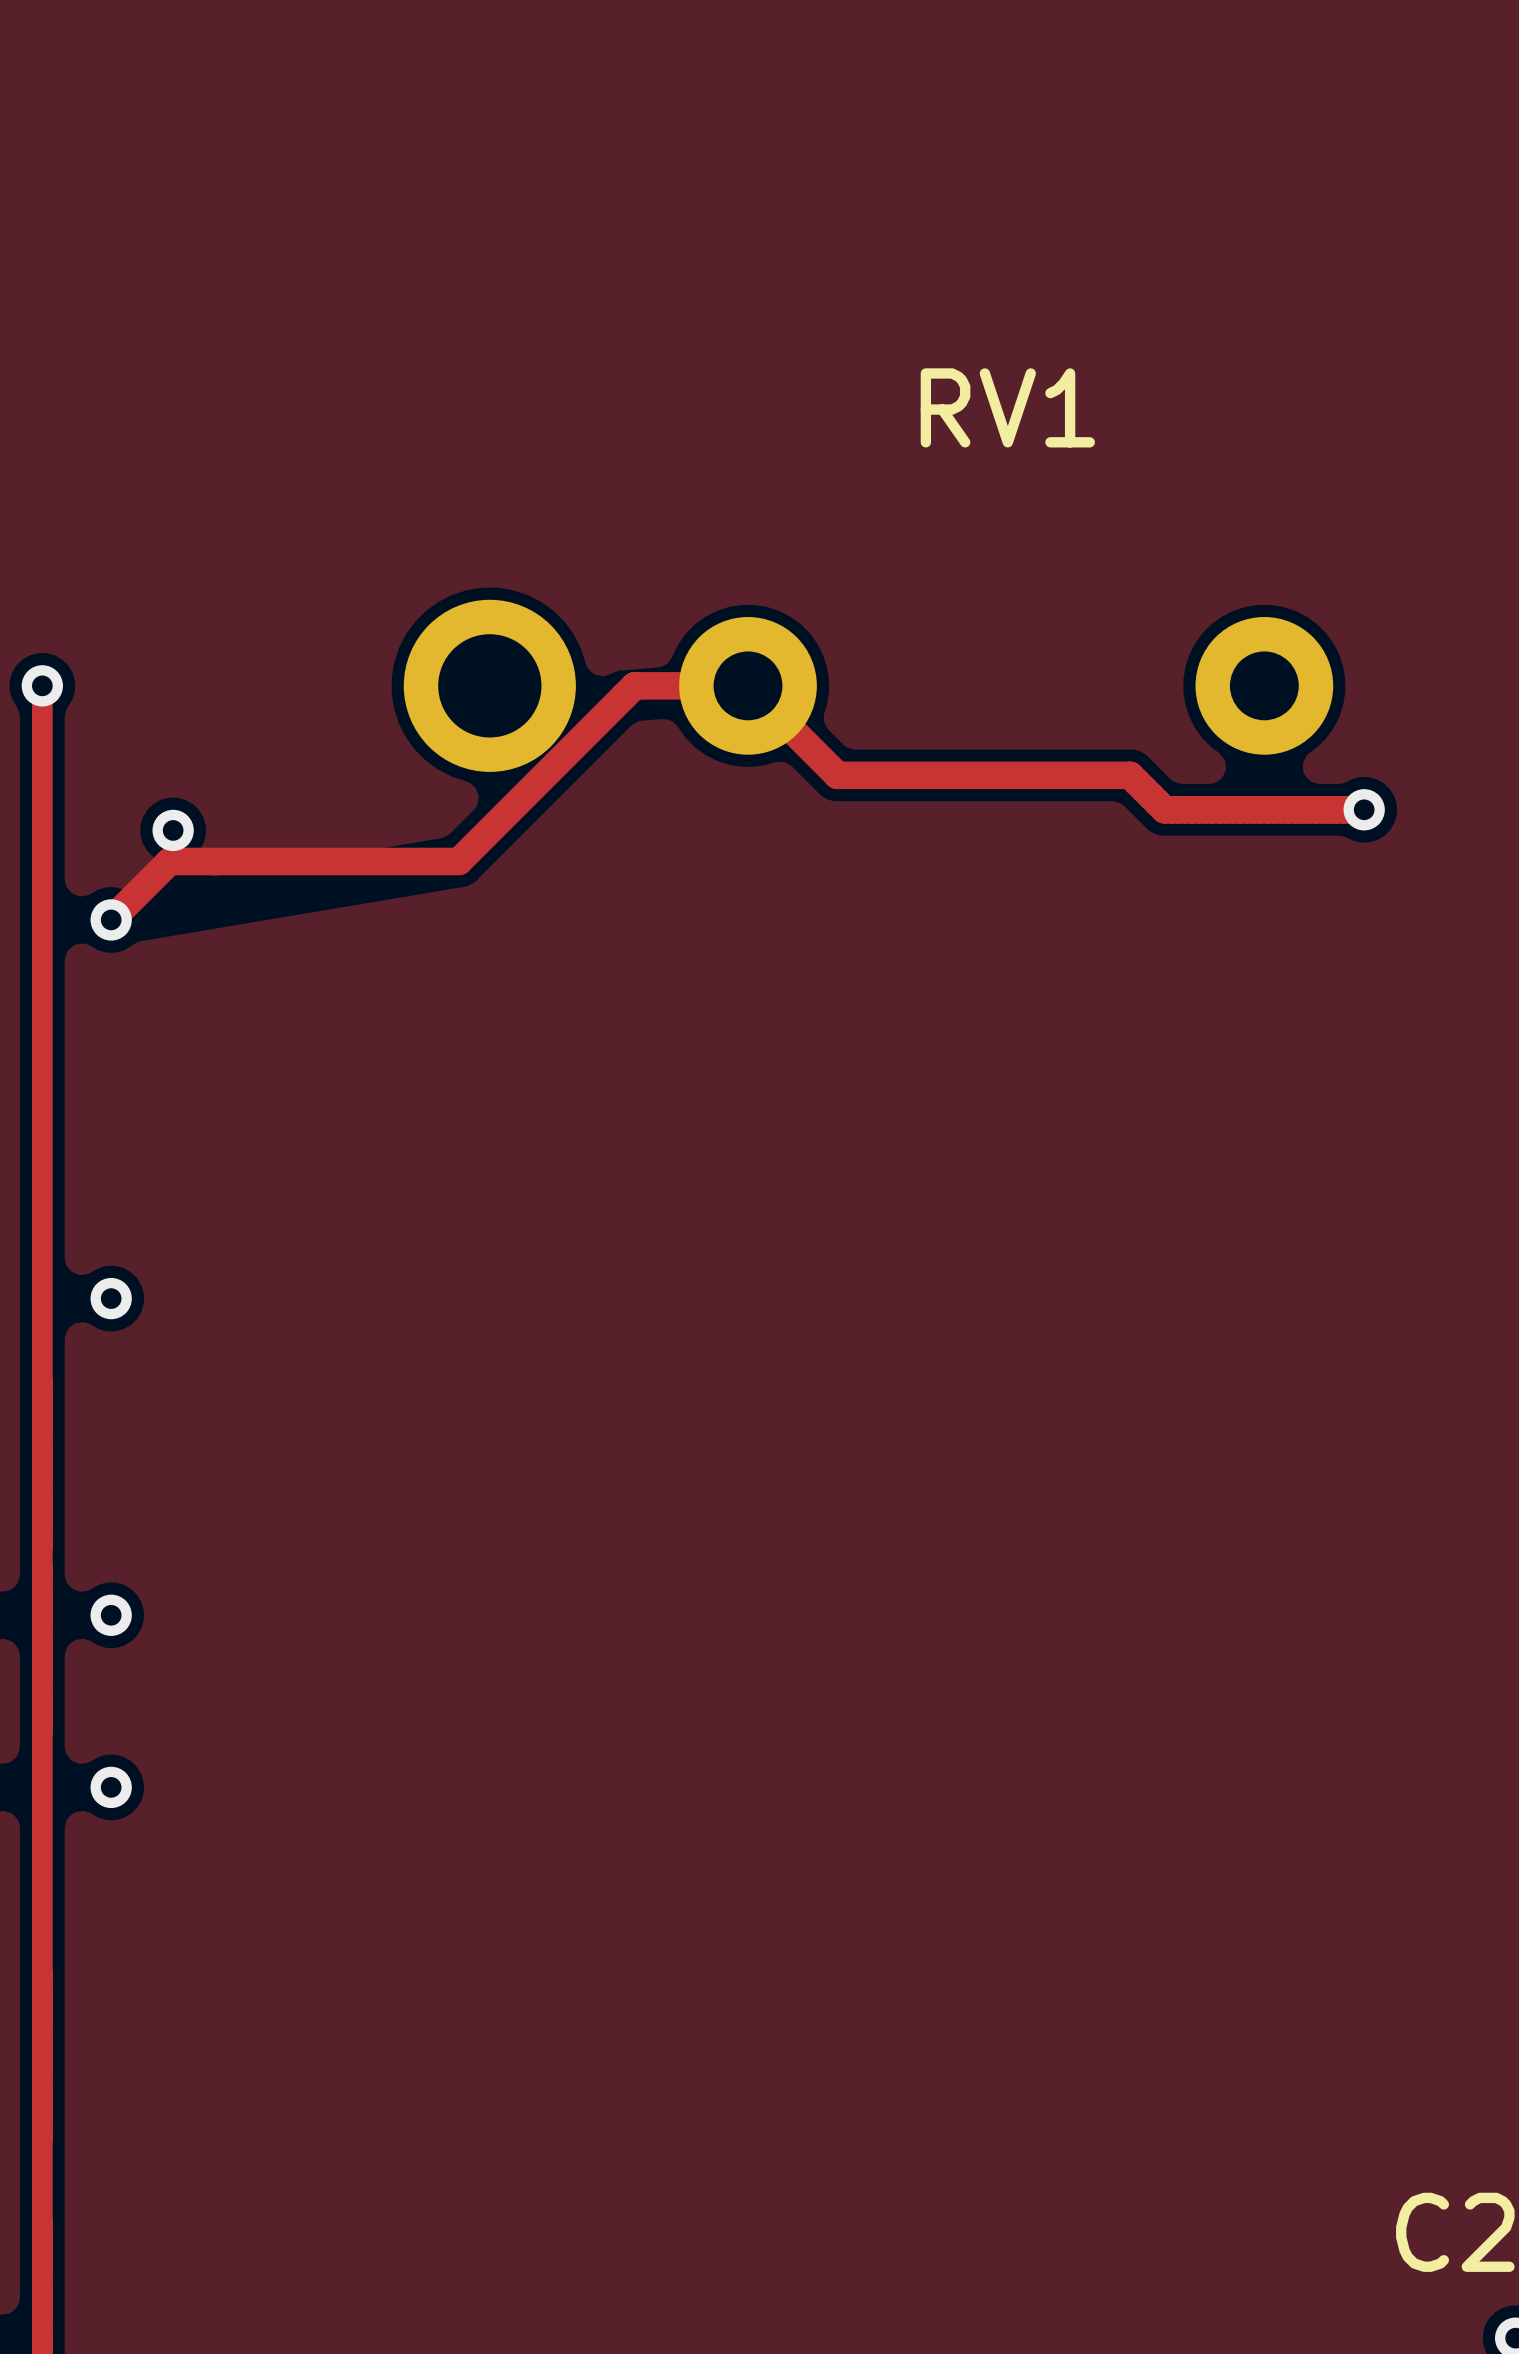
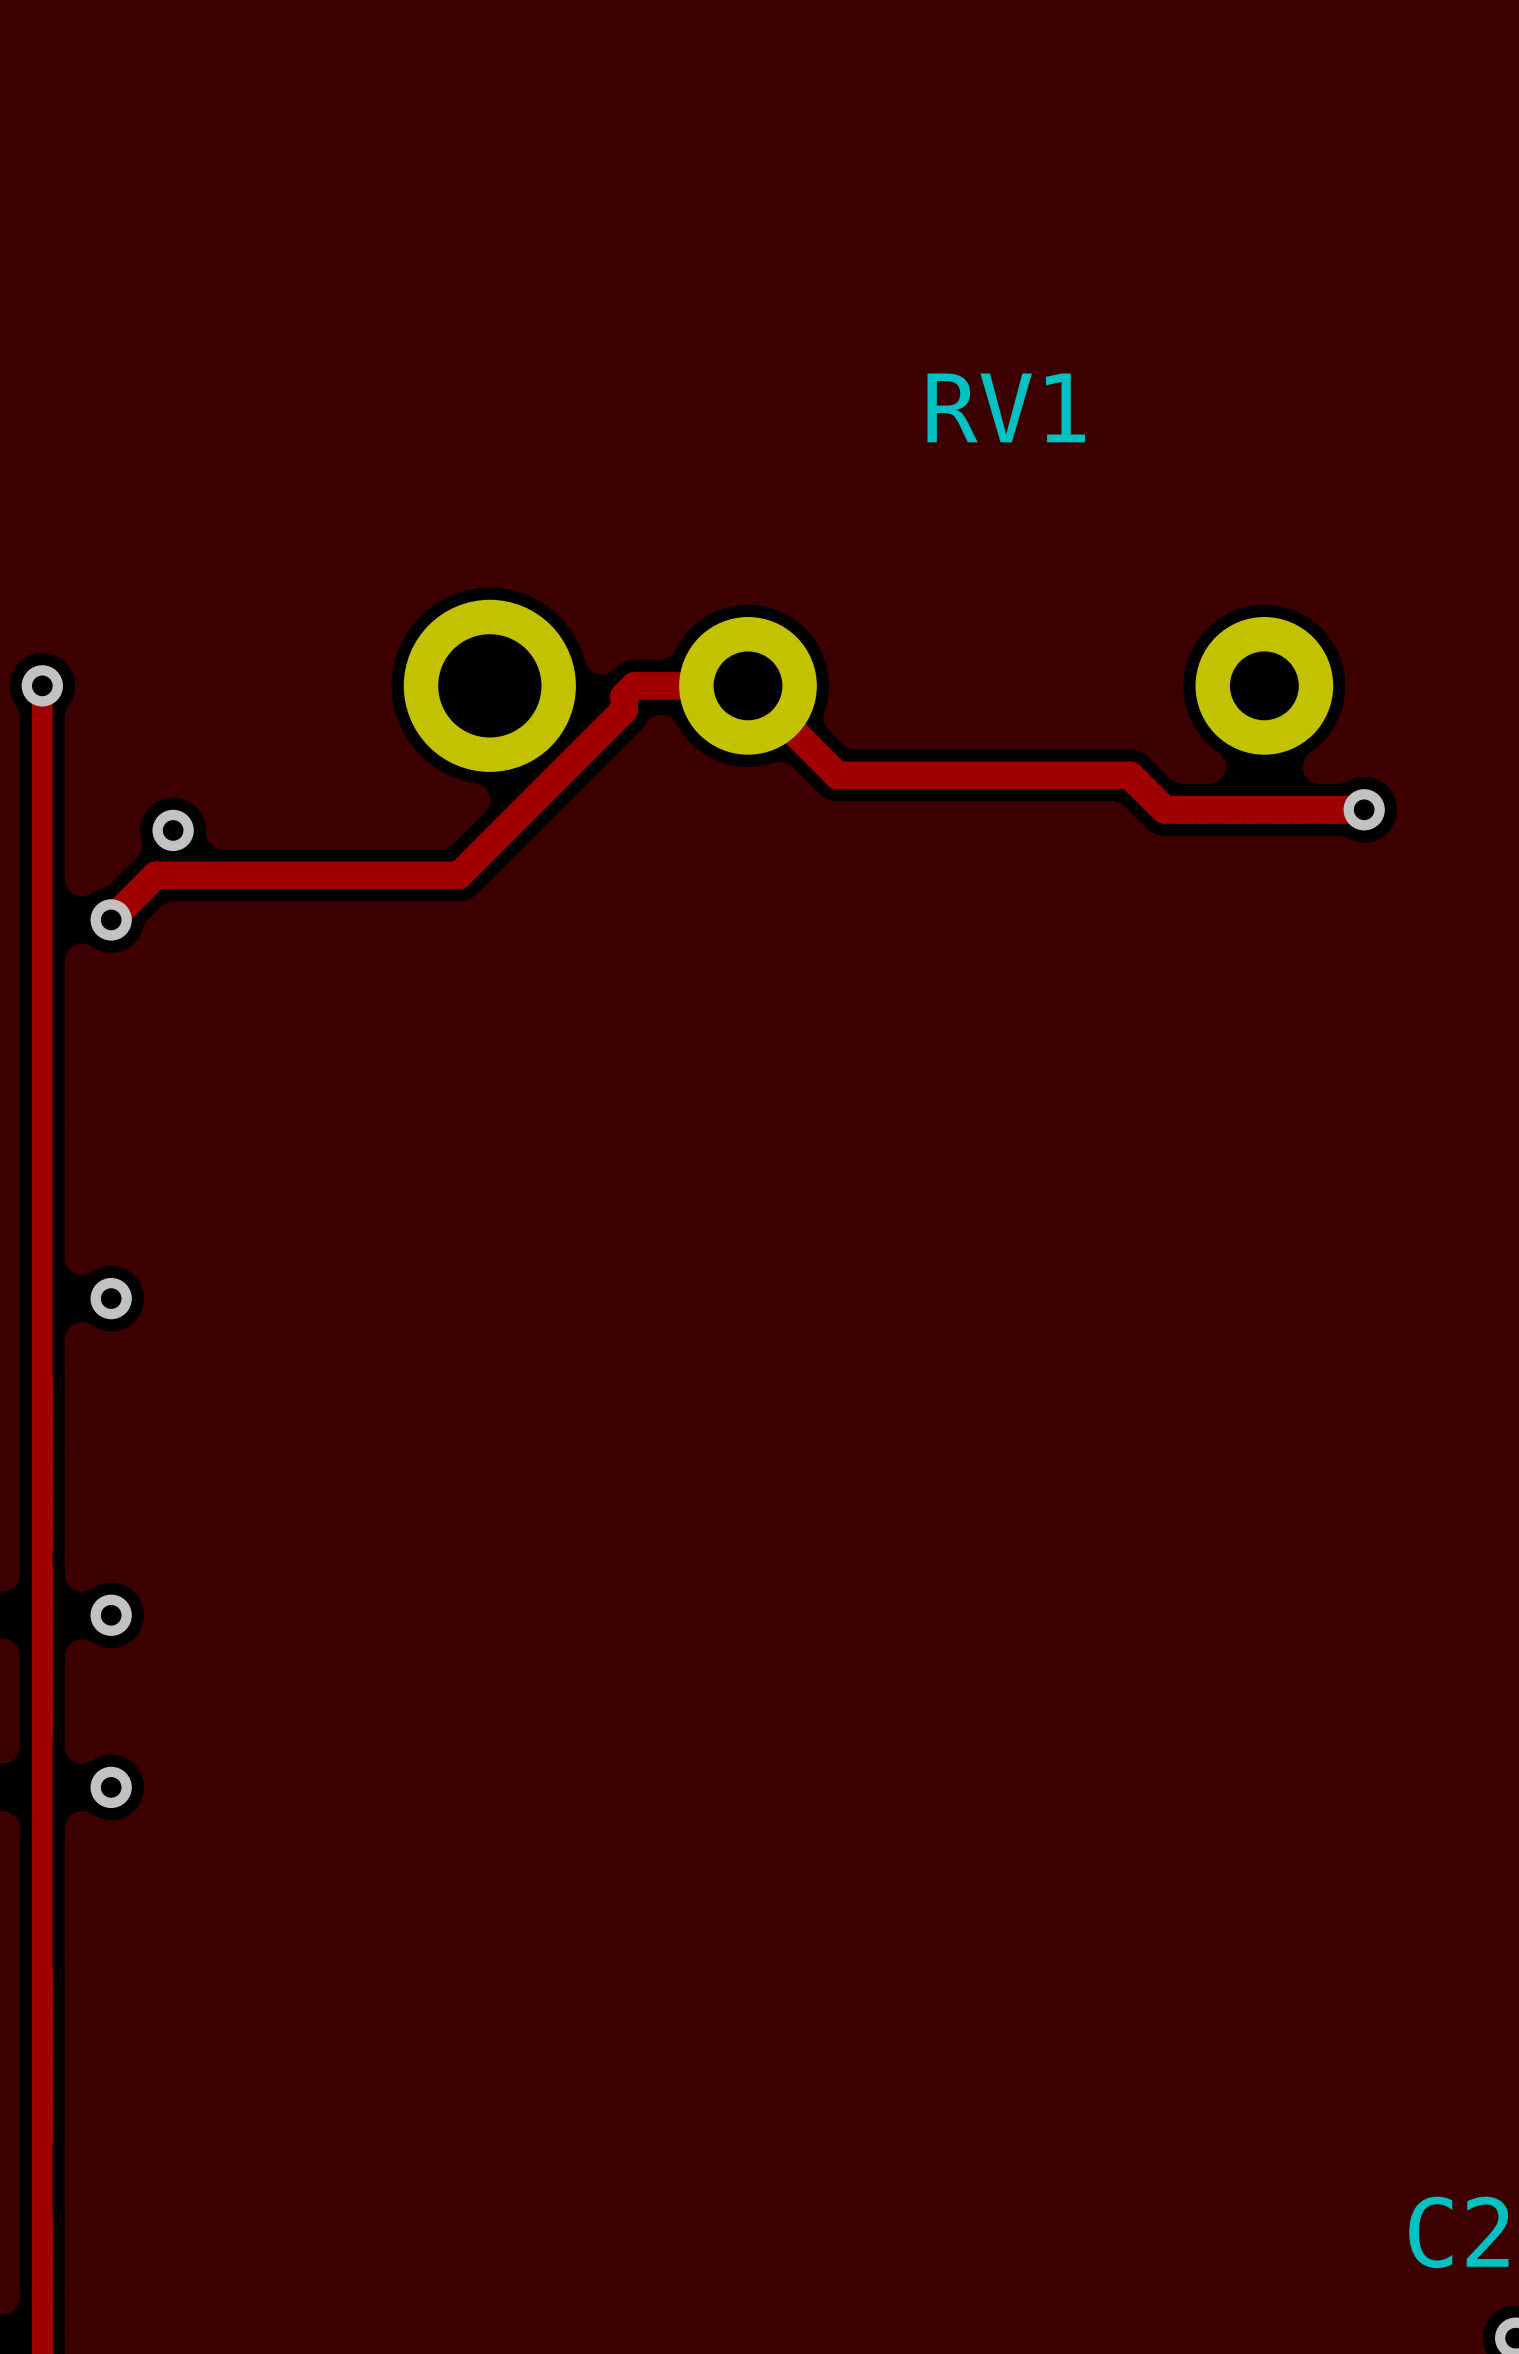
track: (624, 696) (458, 861) (169, 861) (155, 875) -> (624, 696) (624, 710) (458, 875) (155, 875)

